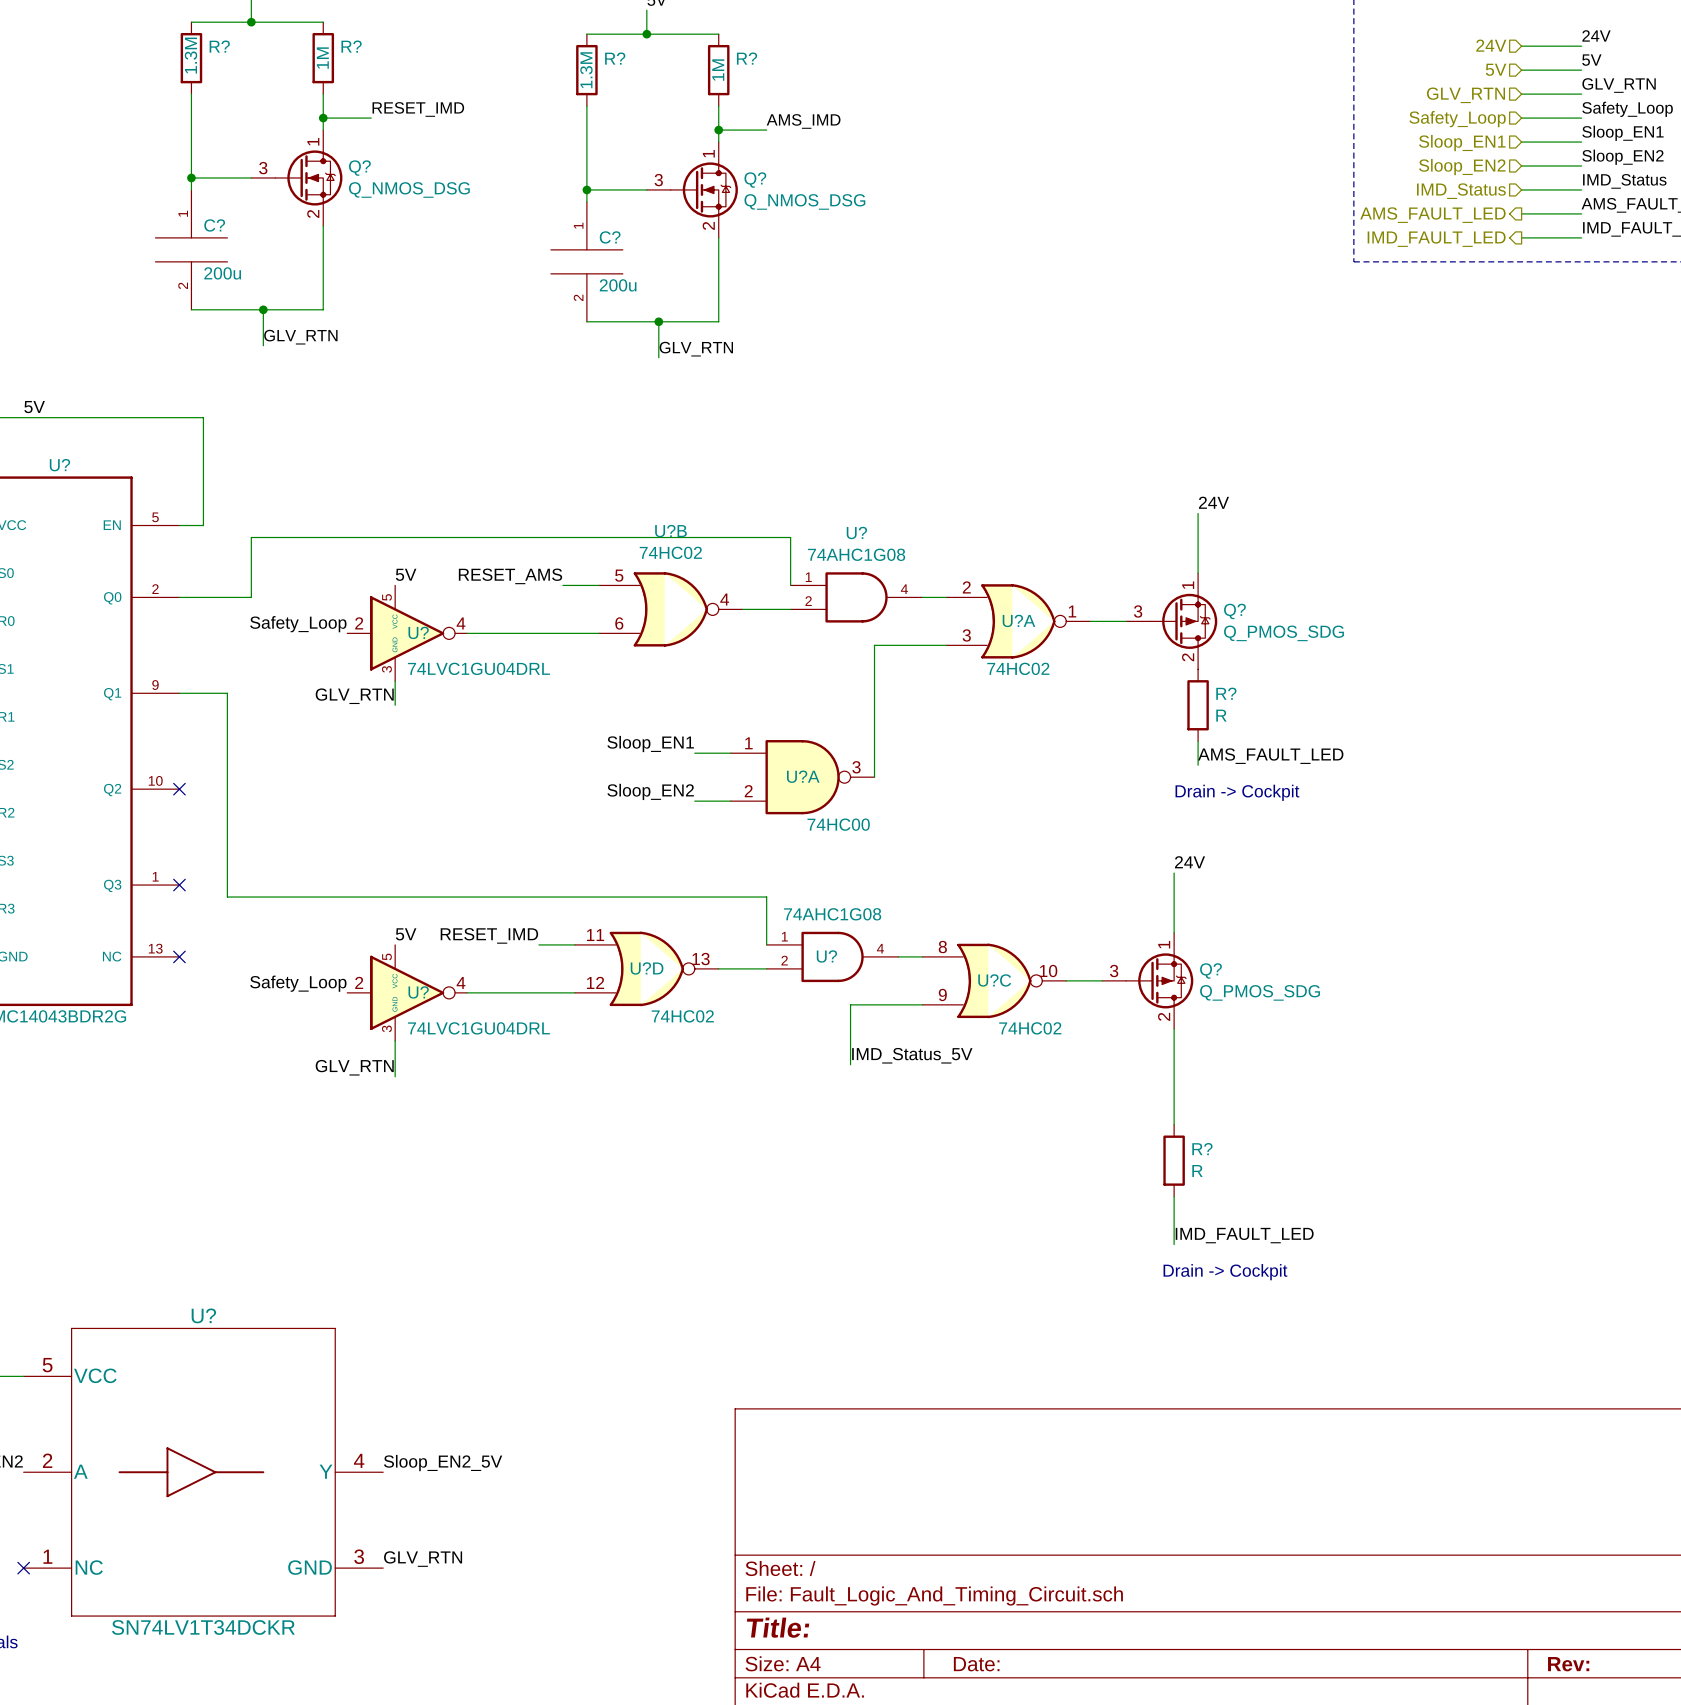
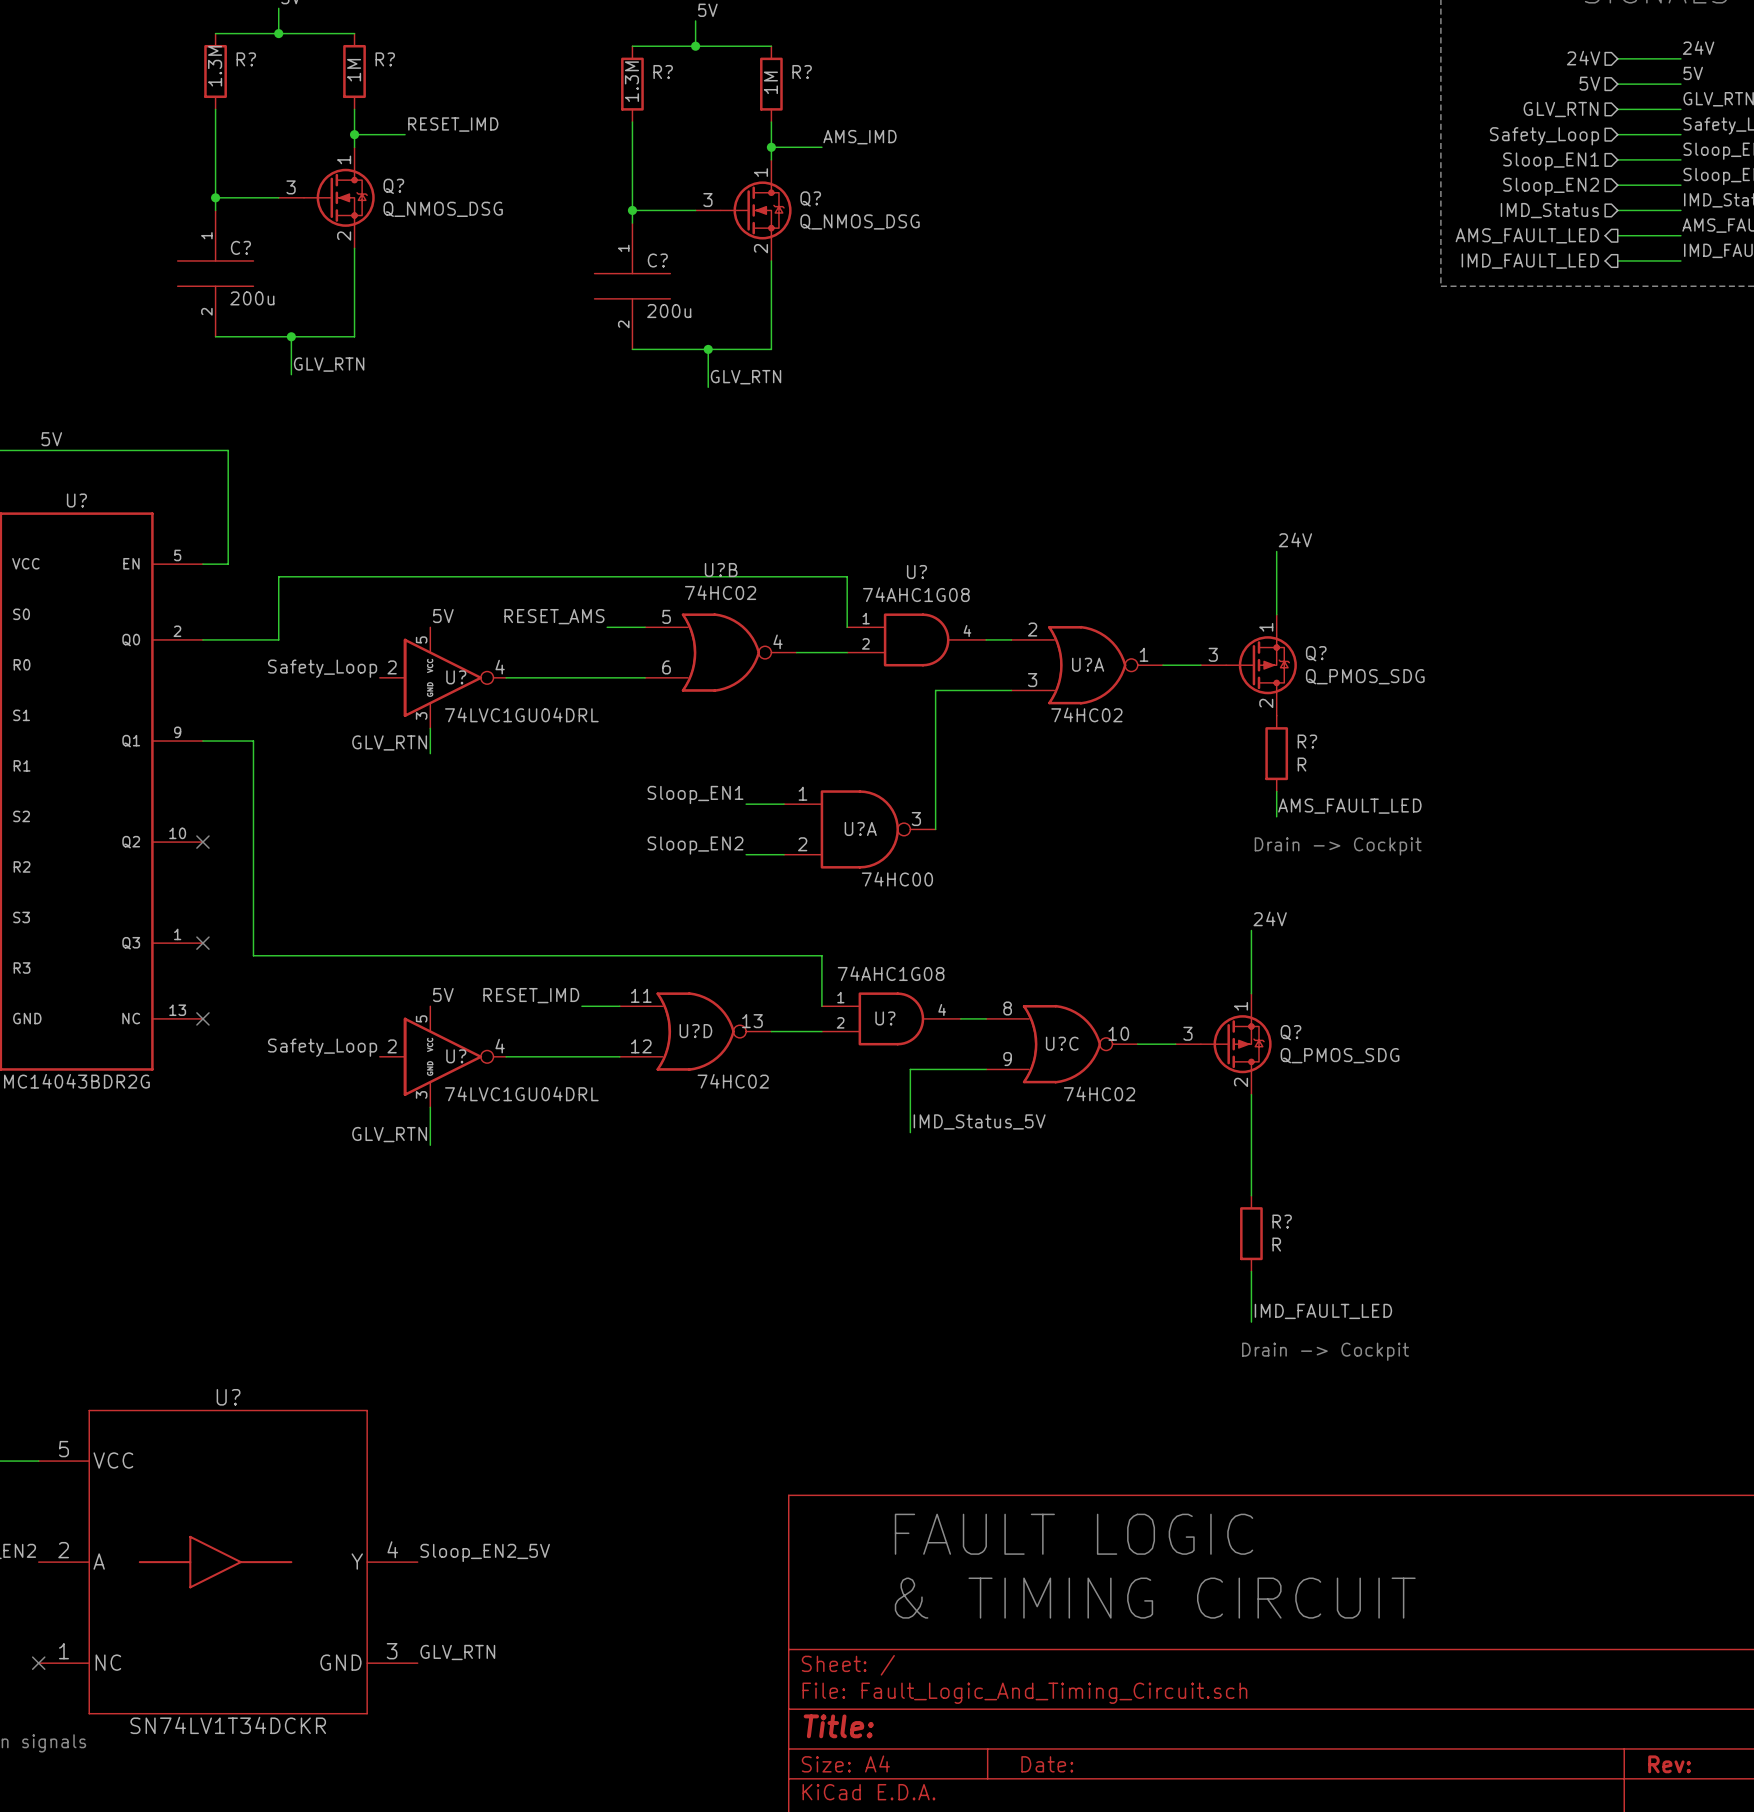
text: none -> FAULT LOGIC (1074, 1534)
text: none -> & TIMING CIRCUIT (1155, 1598)

